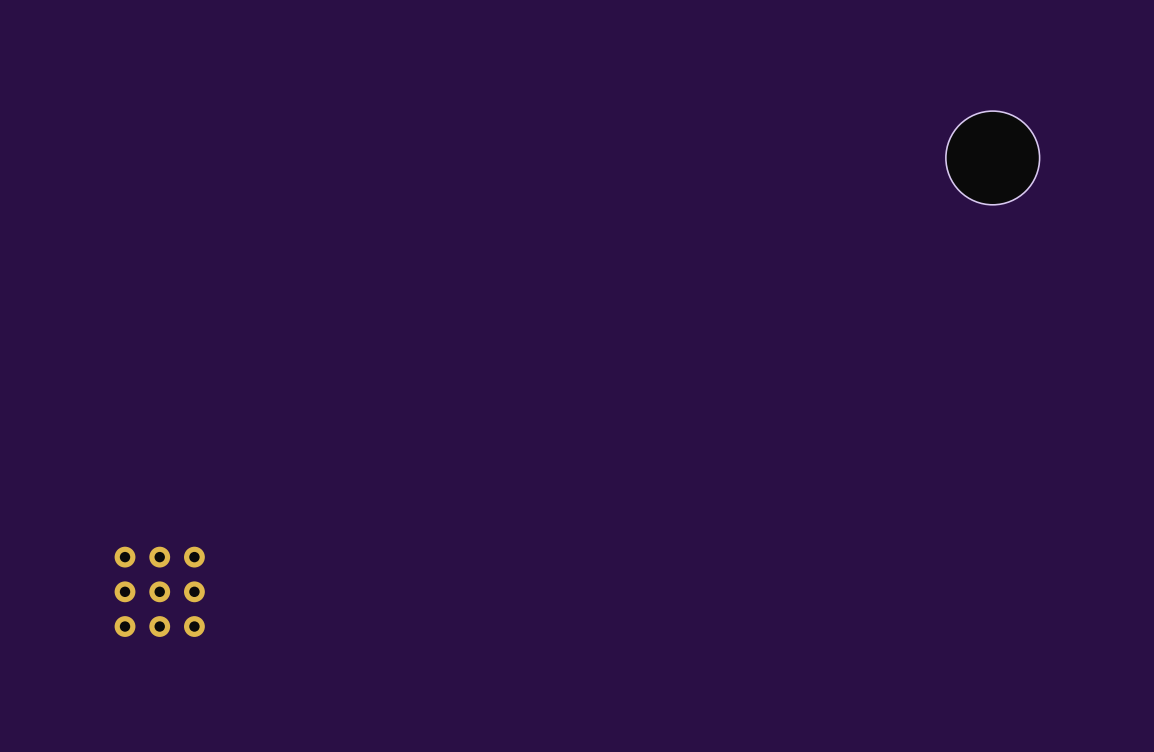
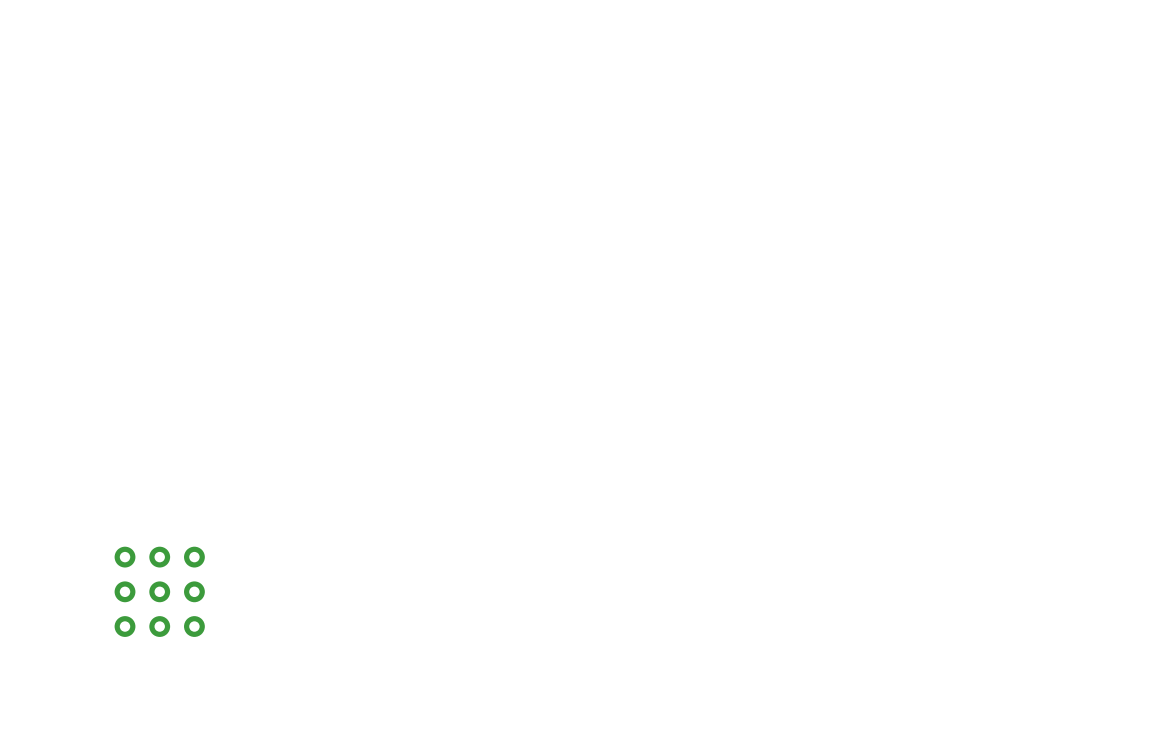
part: (992, 157) -> none

